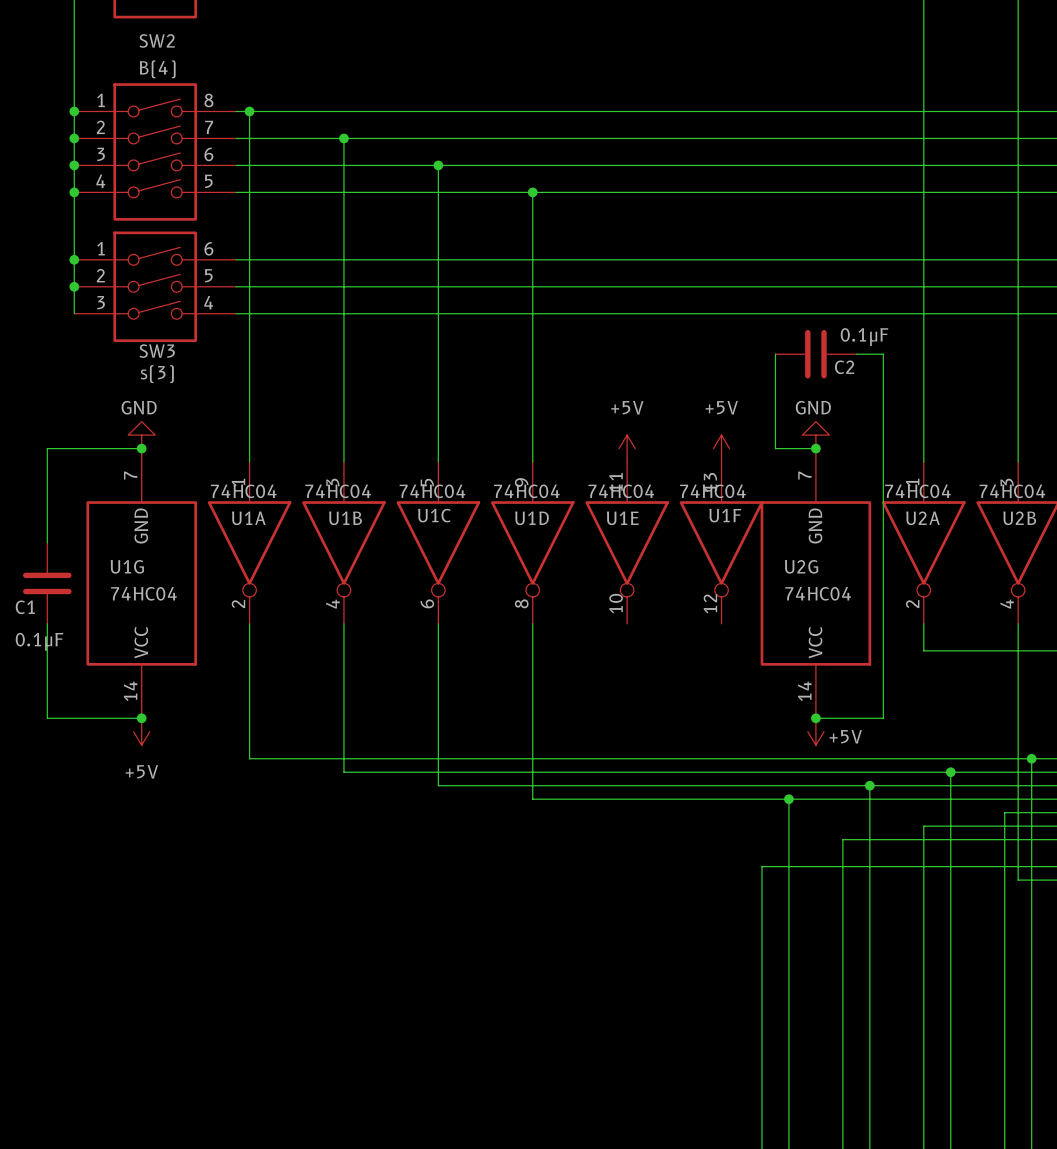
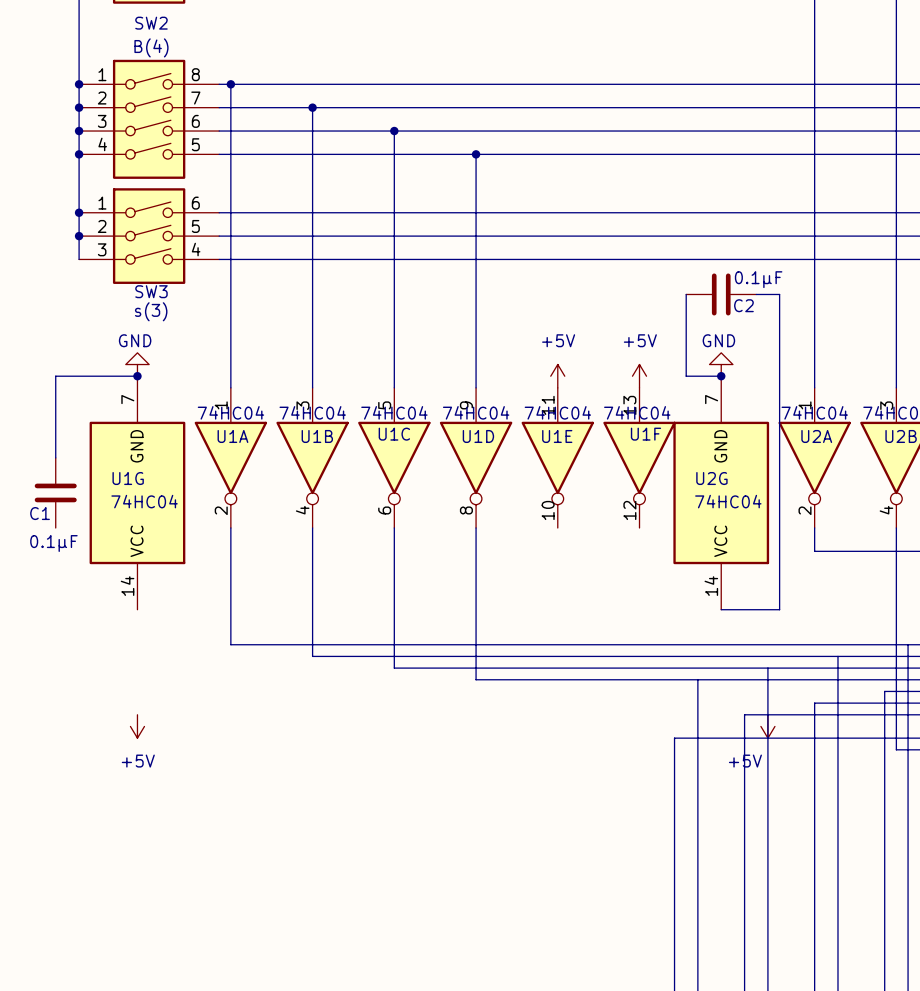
wire: (47, 623) (47, 718) (141, 718) -> none
junction: (141, 718) -> none
junction: (815, 718) -> none
power symbol position: +5V (141, 731) -> +5V (137, 726)
power symbol position: +5V (815, 731) -> +5V (767, 726)
power symbol text position: +5V (845, 736) -> +5V (745, 761)
junction: (1031, 758) -> none
junction: (950, 772) -> none
junction: (869, 785) -> none
junction: (788, 799) -> none

